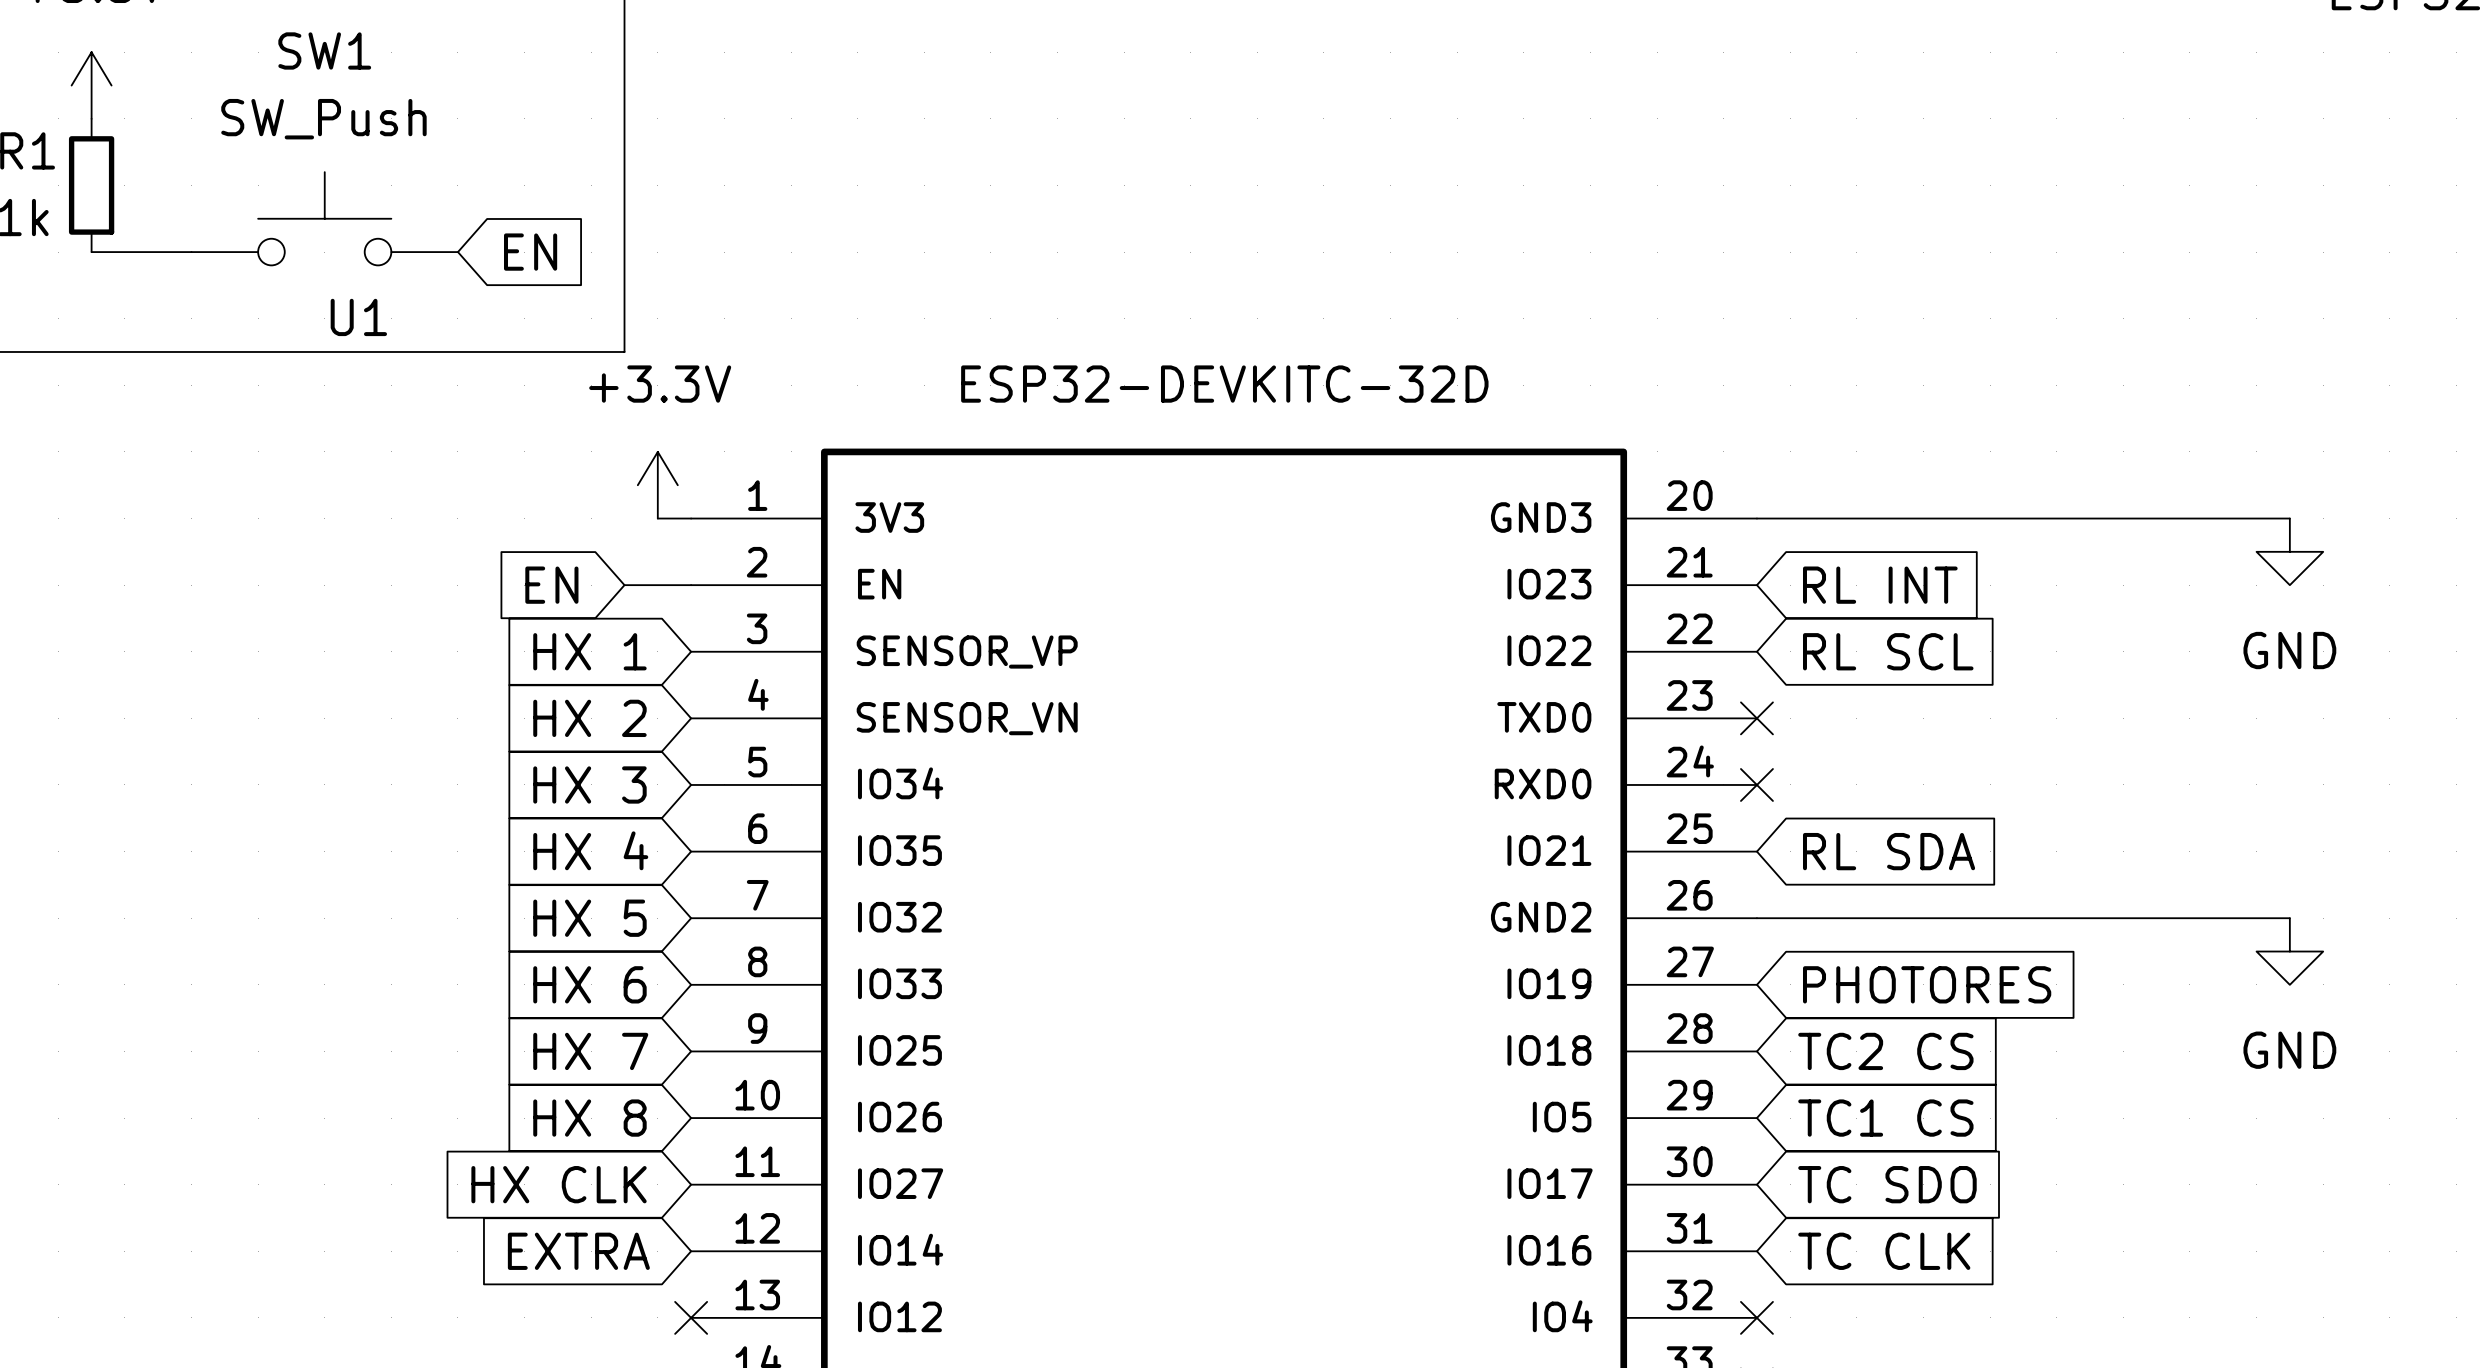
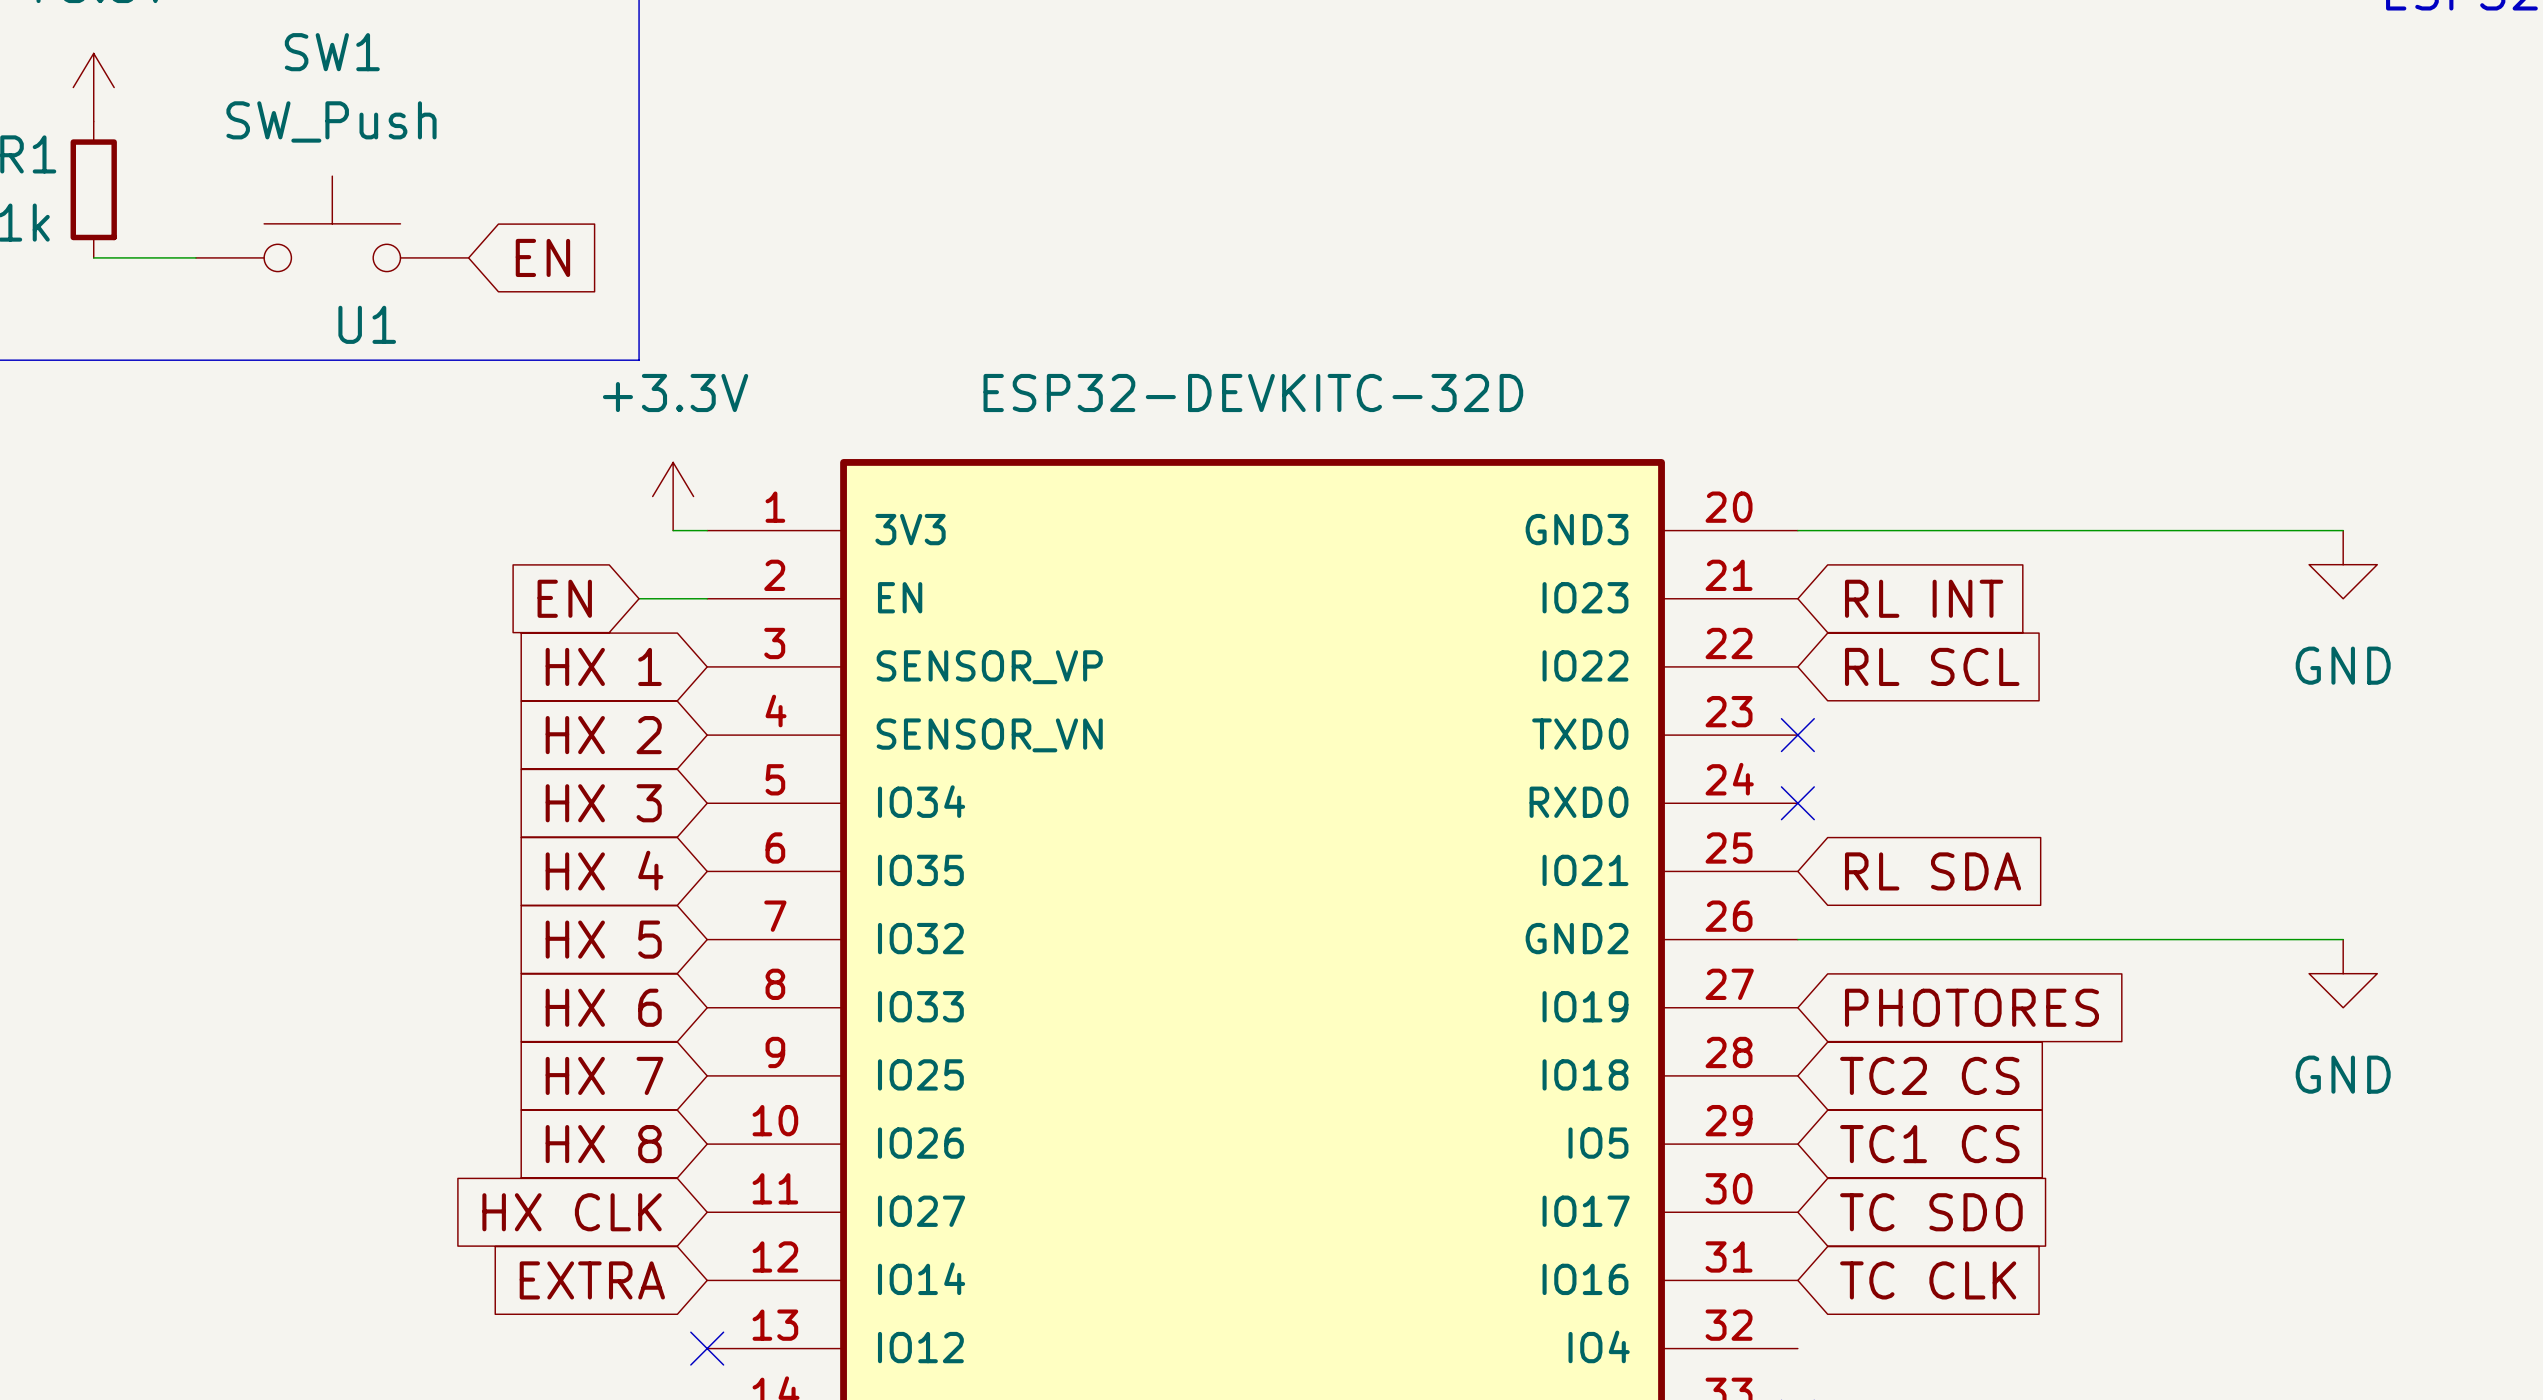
no-connect mark: (1756, 1317) -> none

